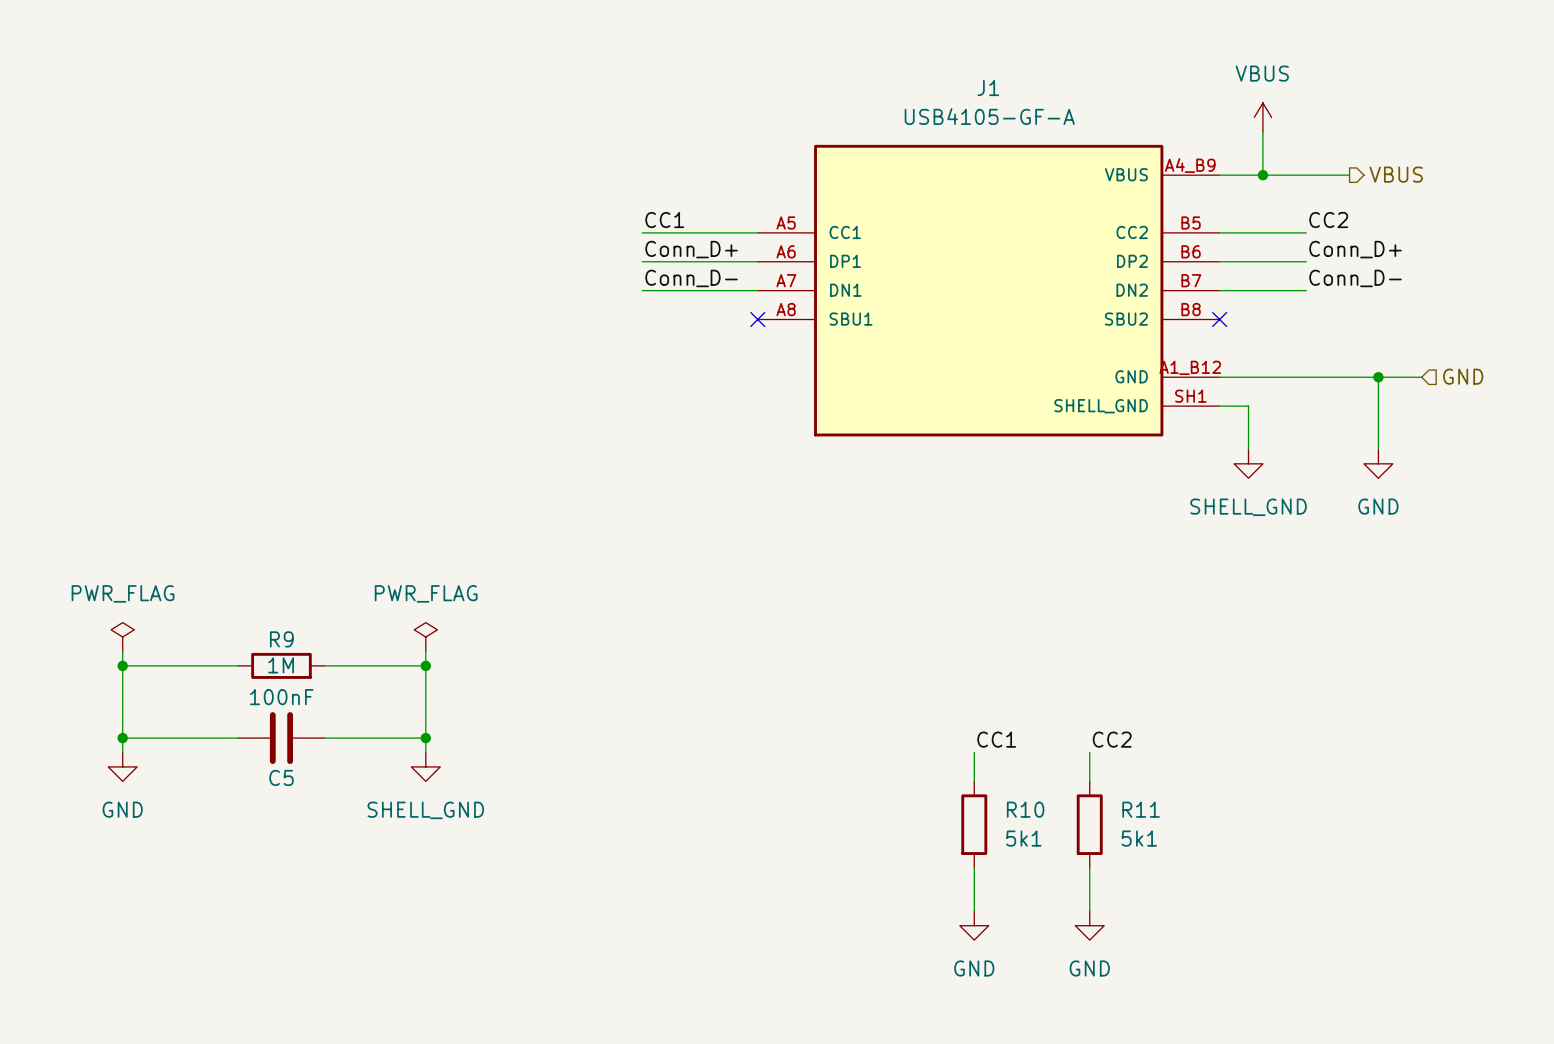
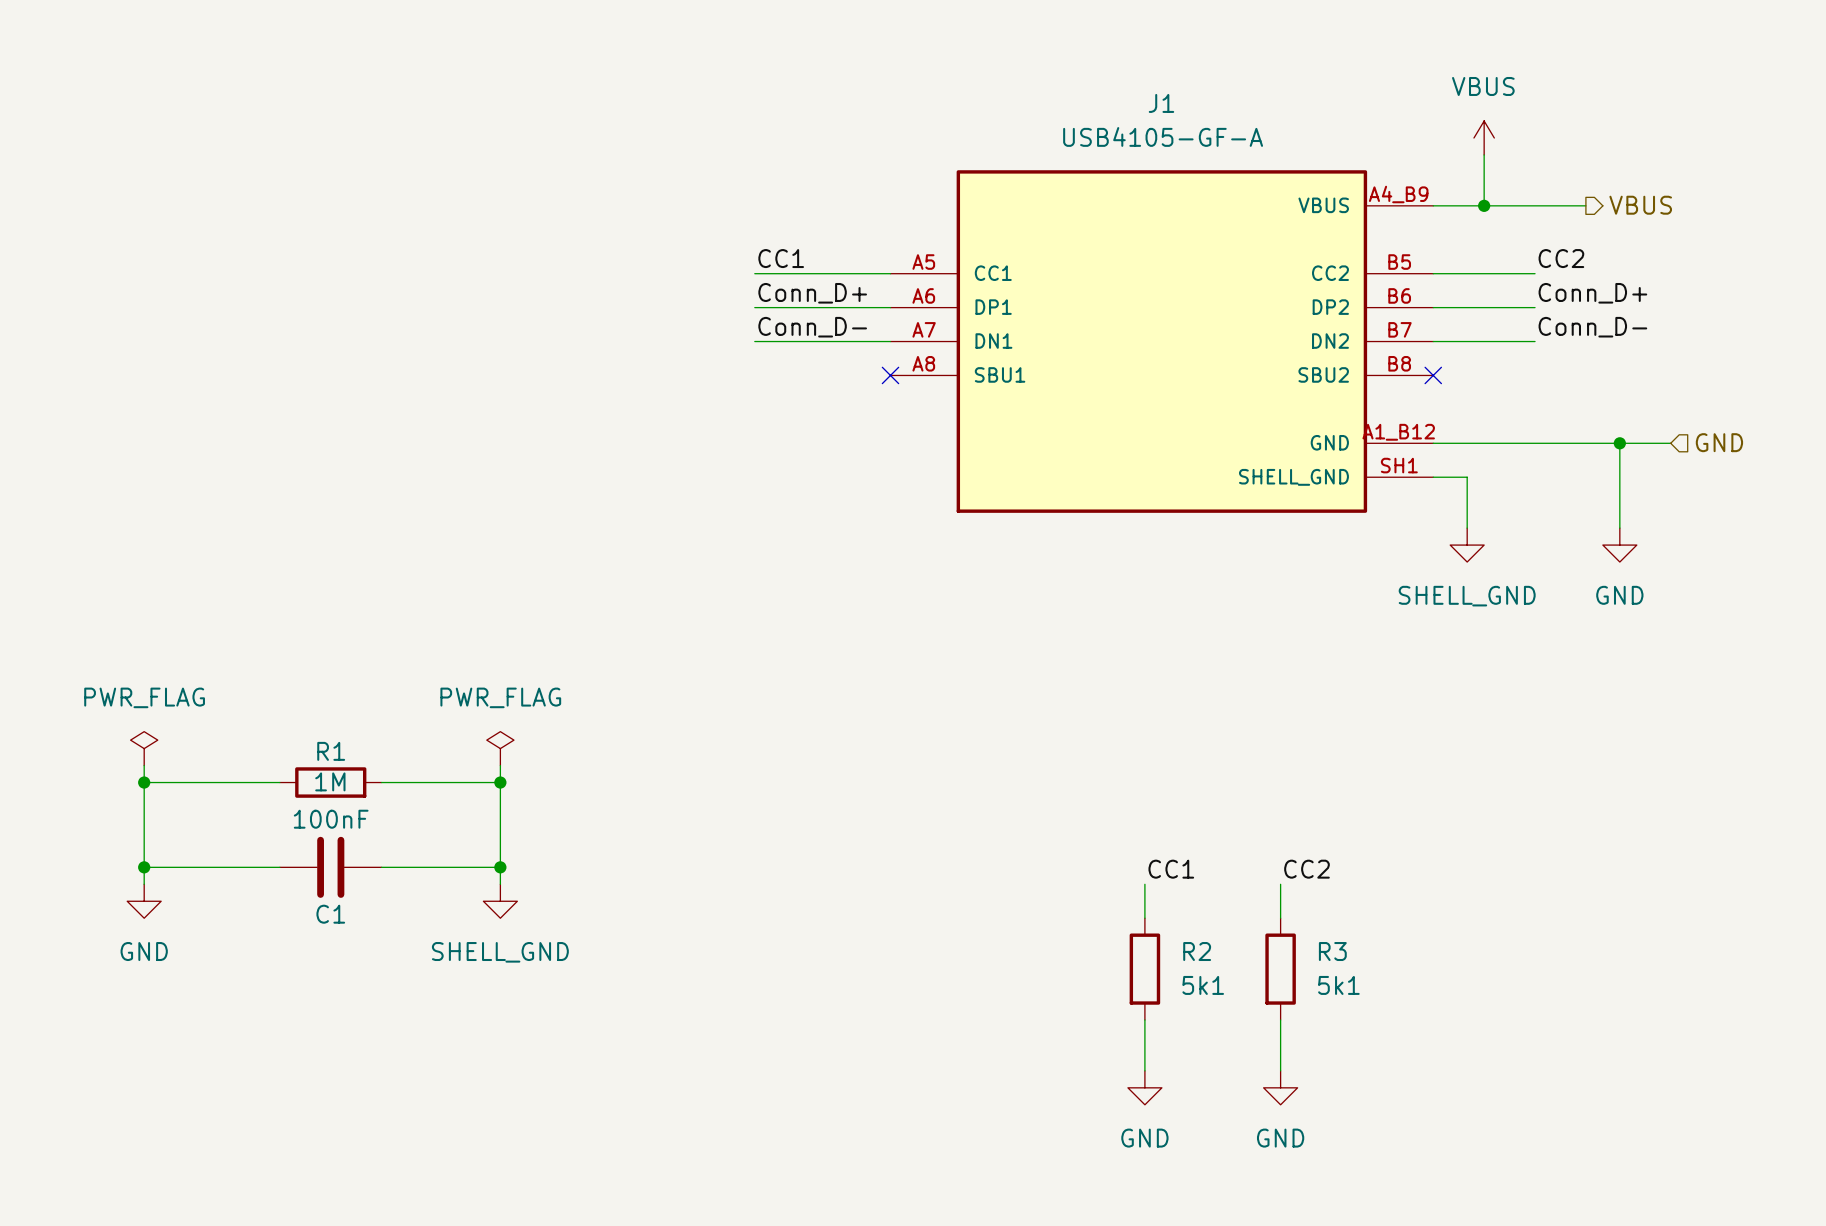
R9 name: R9 (281, 639) -> R1 (331, 751)
C5 name: C5 (281, 777) -> C1 (330, 914)
R10 name: R10 (1025, 809) -> R2 (1197, 951)
R11 name: R11 (1141, 809) -> R3 (1332, 951)

